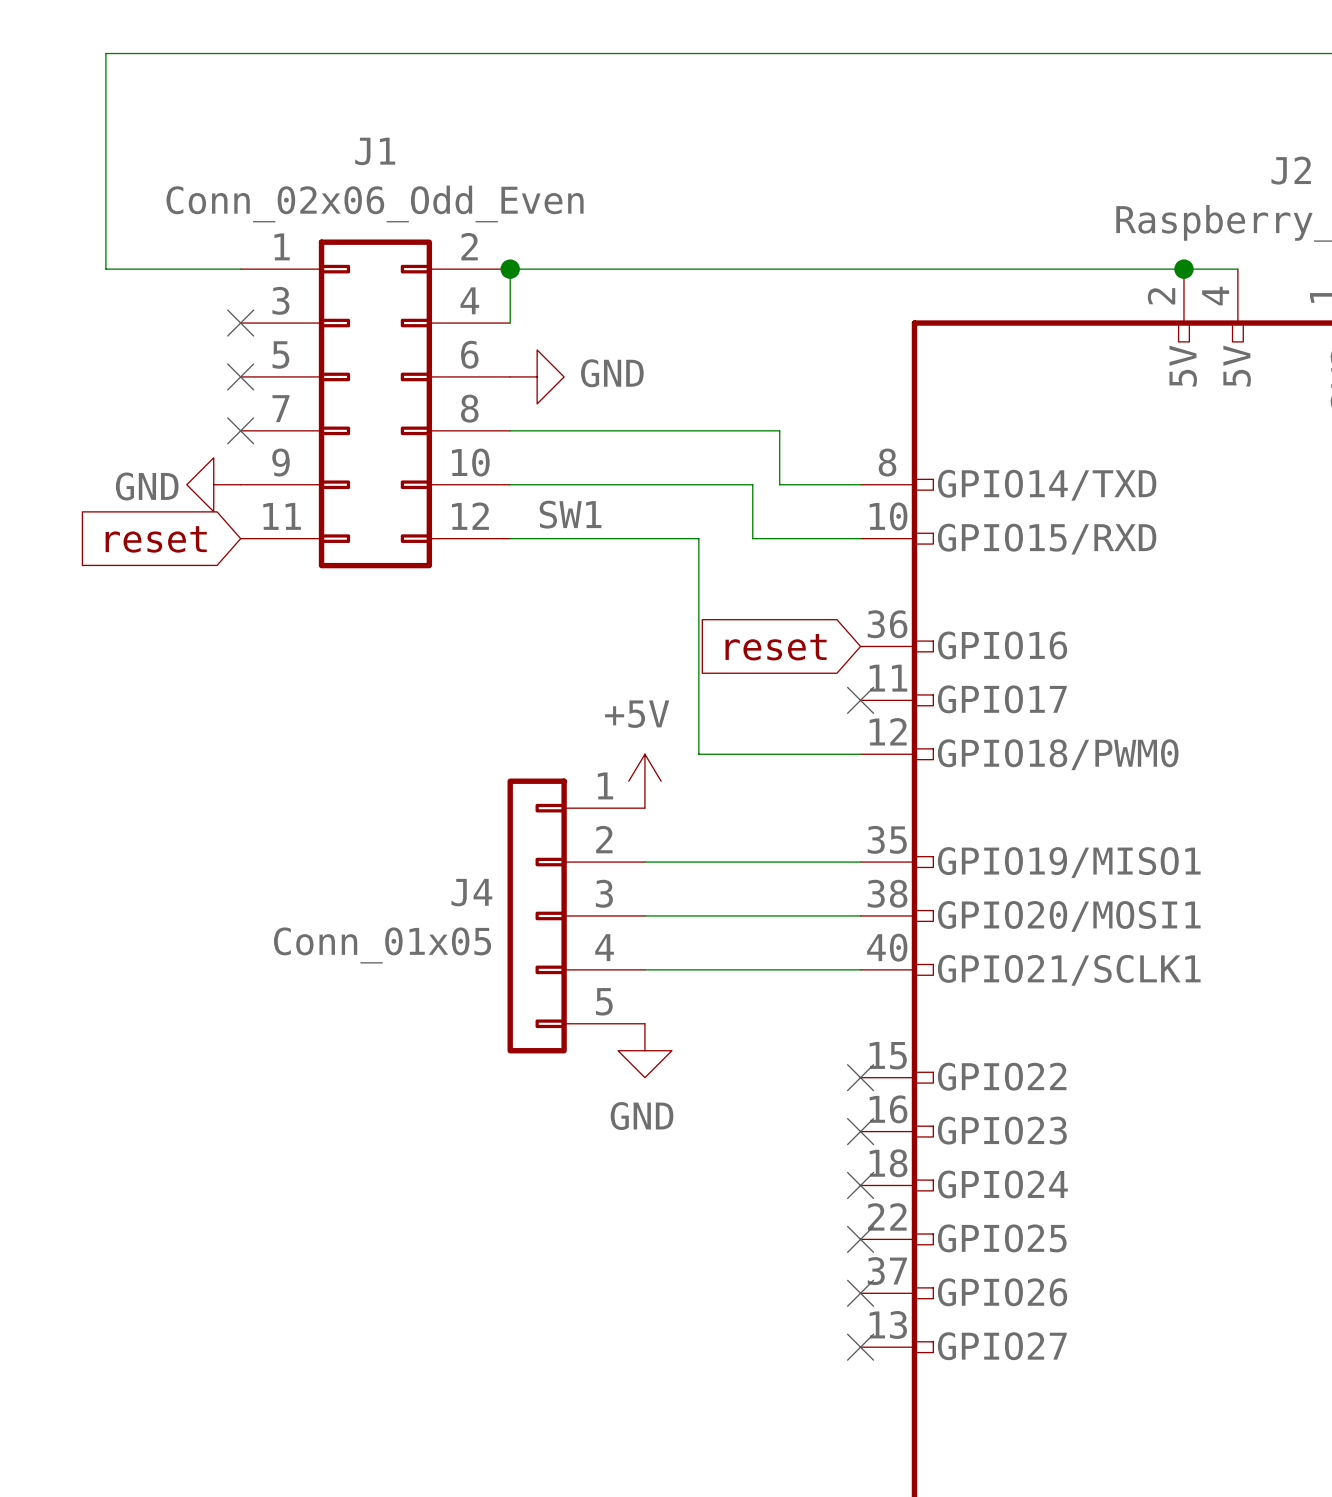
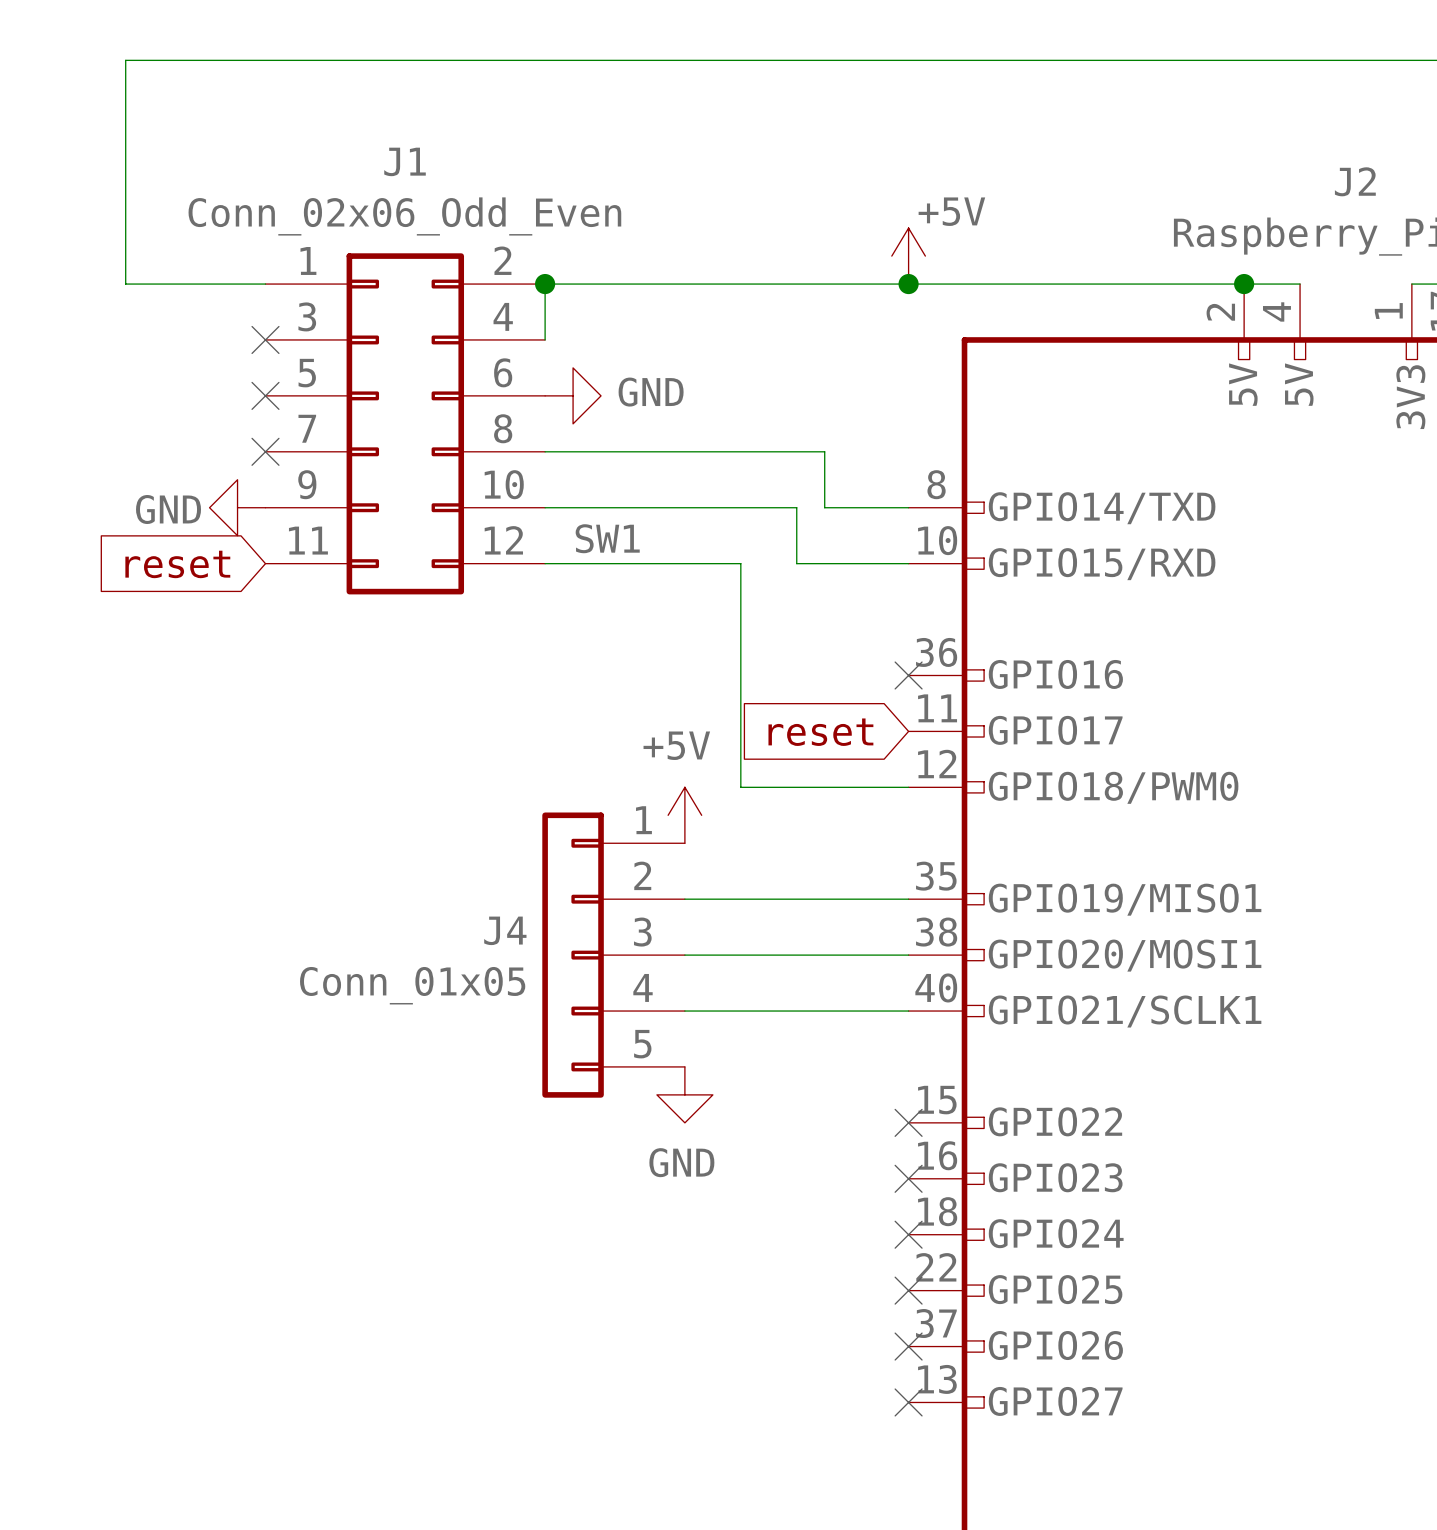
power symbol: none -> +5V (908, 256)
junction: none -> (908, 284)
global label position: reset (776, 647) -> reset (820, 732)
no-connect mark position: (860, 700) -> (908, 675)

